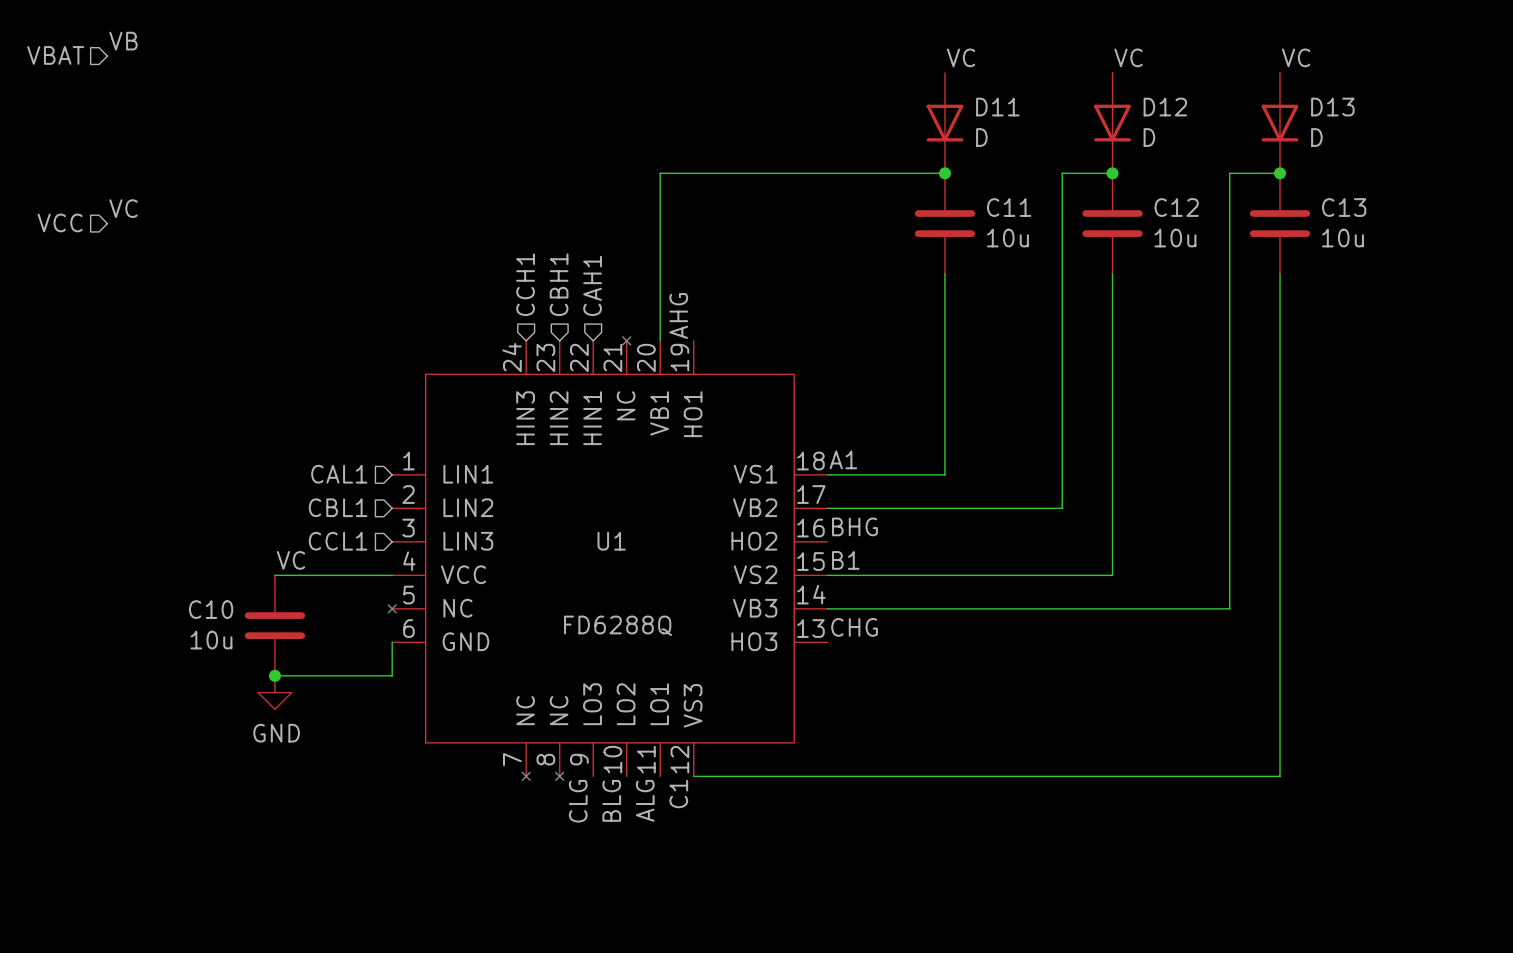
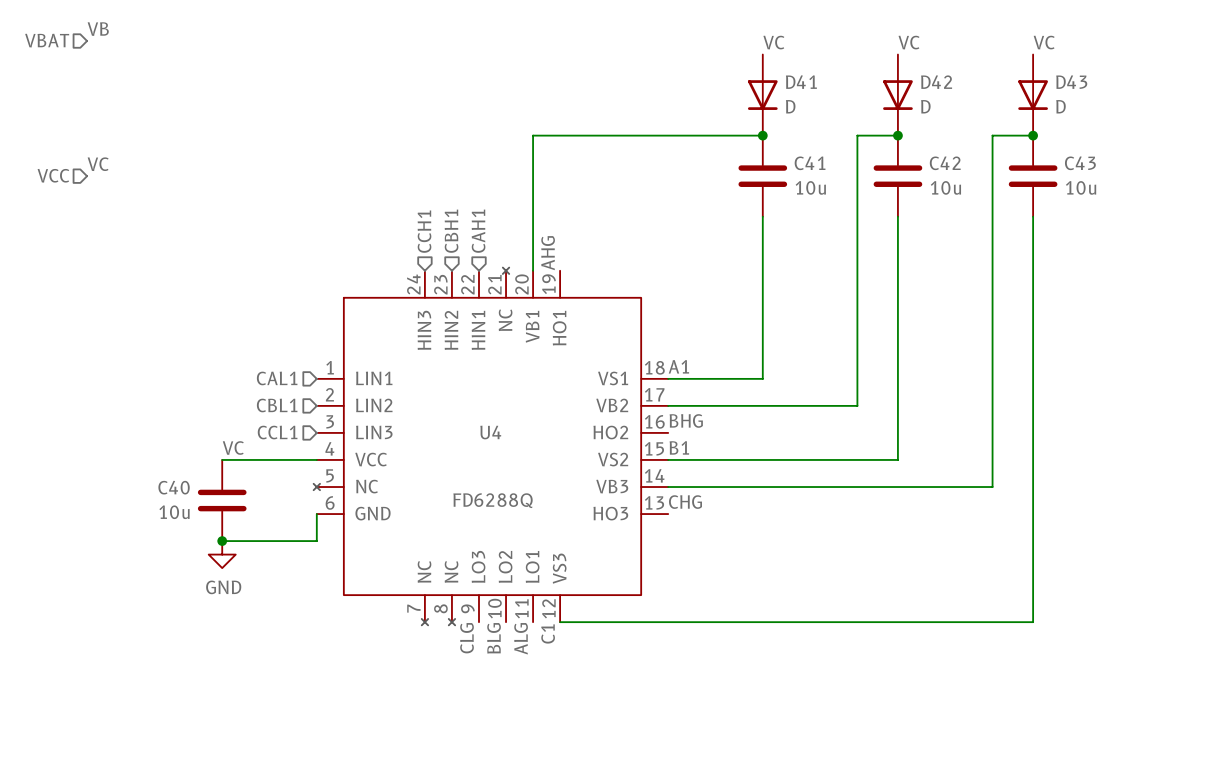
D11 name: D11 (997, 107) -> D41 (801, 82)
D12 name: D12 (1165, 107) -> D42 (936, 82)
D13 name: D13 (1332, 107) -> D43 (1071, 82)
C11 name: C11 (1009, 207) -> C41 (810, 163)
C12 name: C12 (1176, 207) -> C42 (945, 163)
C13 name: C13 (1344, 207) -> C43 (1080, 163)
U1 name: U1 (611, 541) -> U4 (490, 432)
C10 name: C10 (211, 609) -> C40 (174, 487)

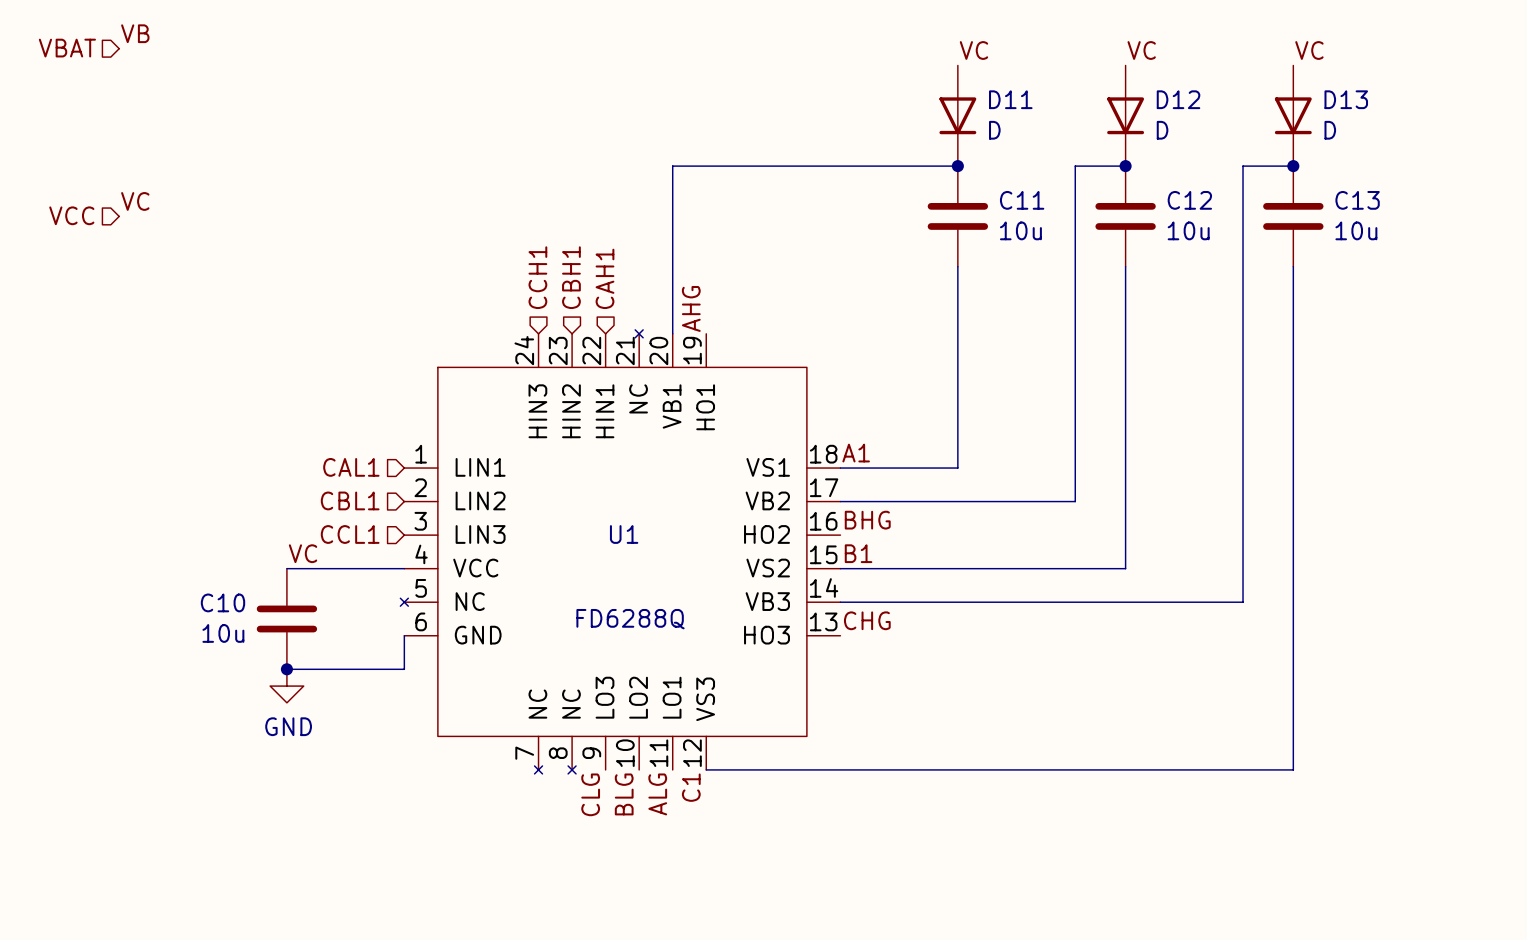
D41 name: D41 (801, 82) -> D11 (1010, 99)
D42 name: D42 (936, 82) -> D12 (1178, 99)
D43 name: D43 (1071, 82) -> D13 (1346, 99)
C41 name: C41 (810, 163) -> C11 (1022, 200)
C42 name: C42 (945, 163) -> C12 (1189, 200)
C43 name: C43 (1080, 163) -> C13 (1357, 200)
U4 name: U4 (490, 432) -> U1 (624, 534)
C40 name: C40 (174, 487) -> C10 (223, 602)

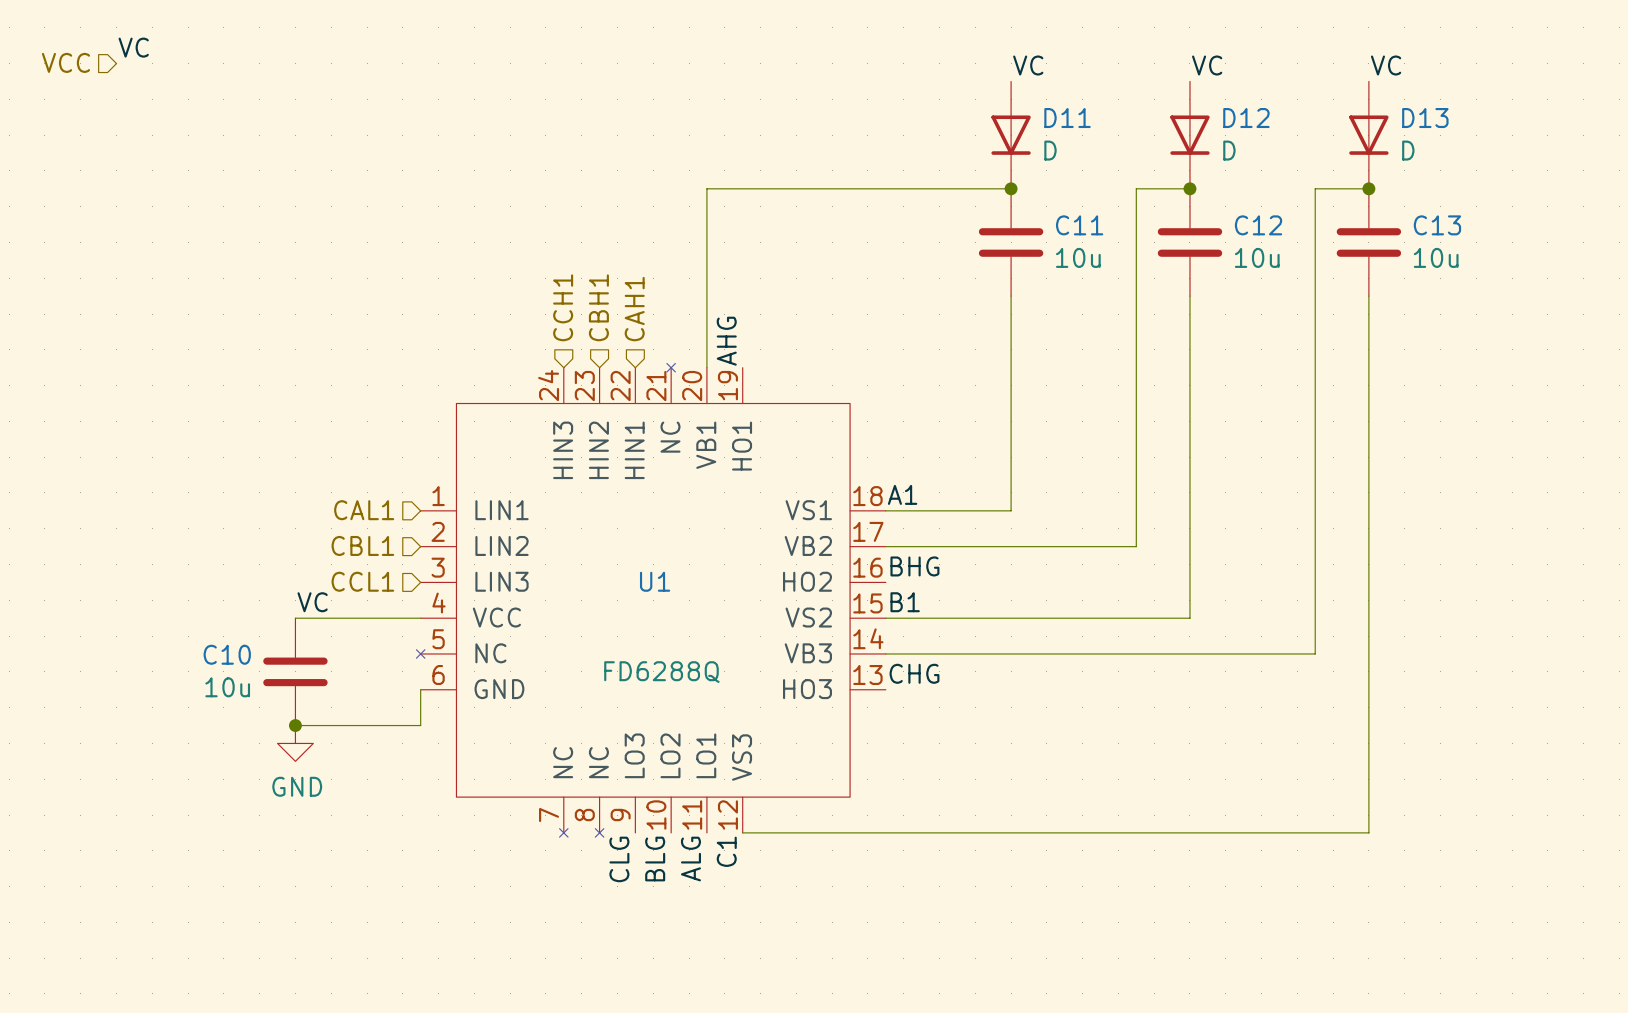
label: VB (135, 33) -> VC (133, 47)
hierarchical label: VBAT (67, 48) -> VCC (65, 62)
label: VC (135, 201) -> none
hierarchical label: VCC (71, 215) -> none

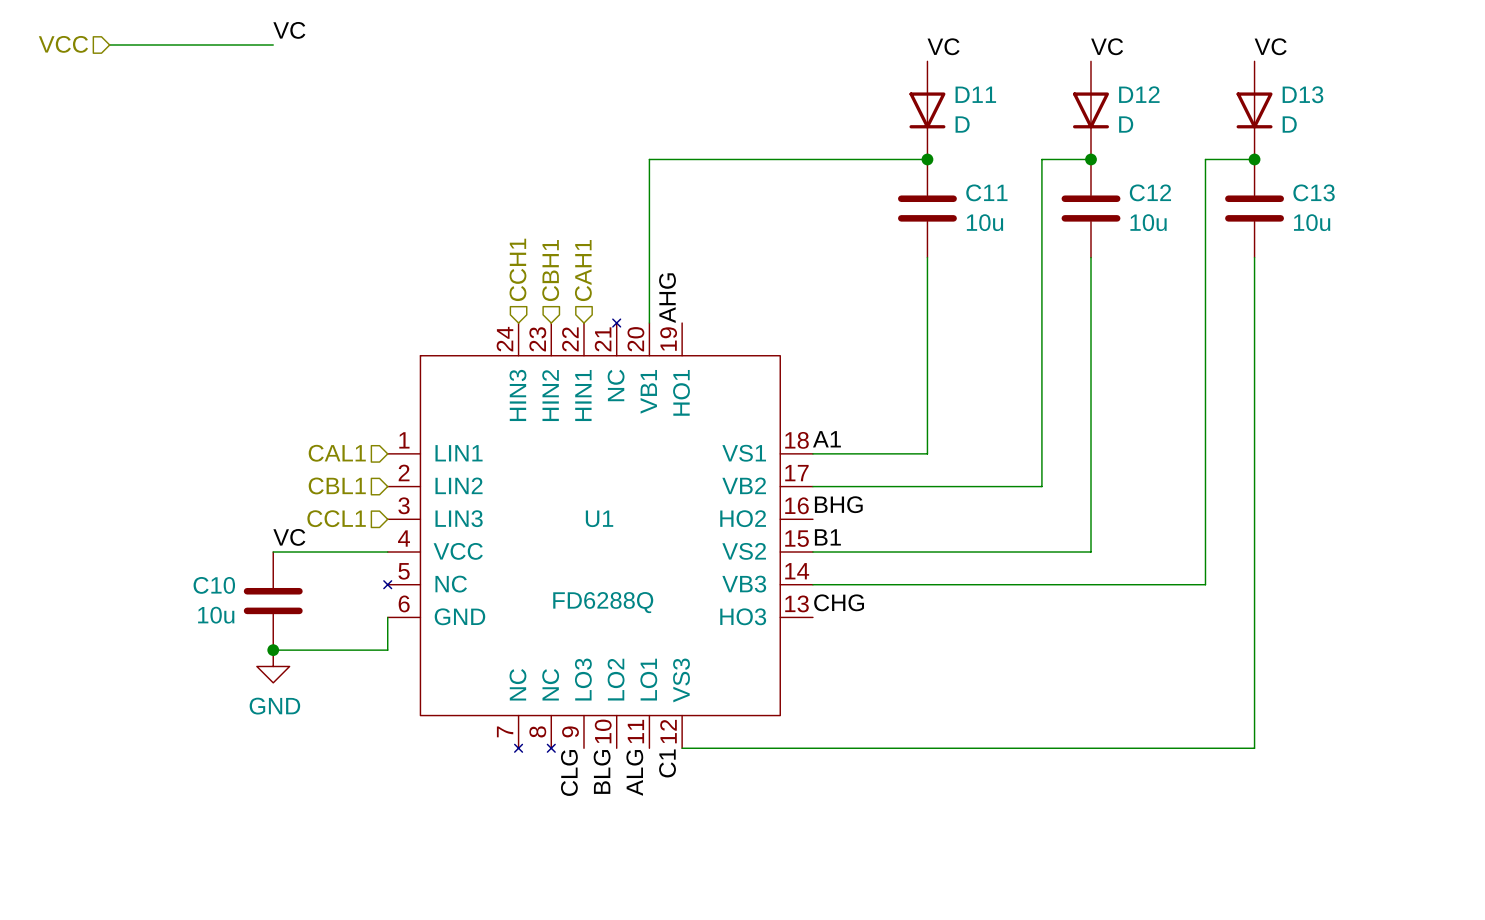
label position: VC (133, 47) -> VC (289, 30)
wire: none -> (109, 44) (273, 44)

